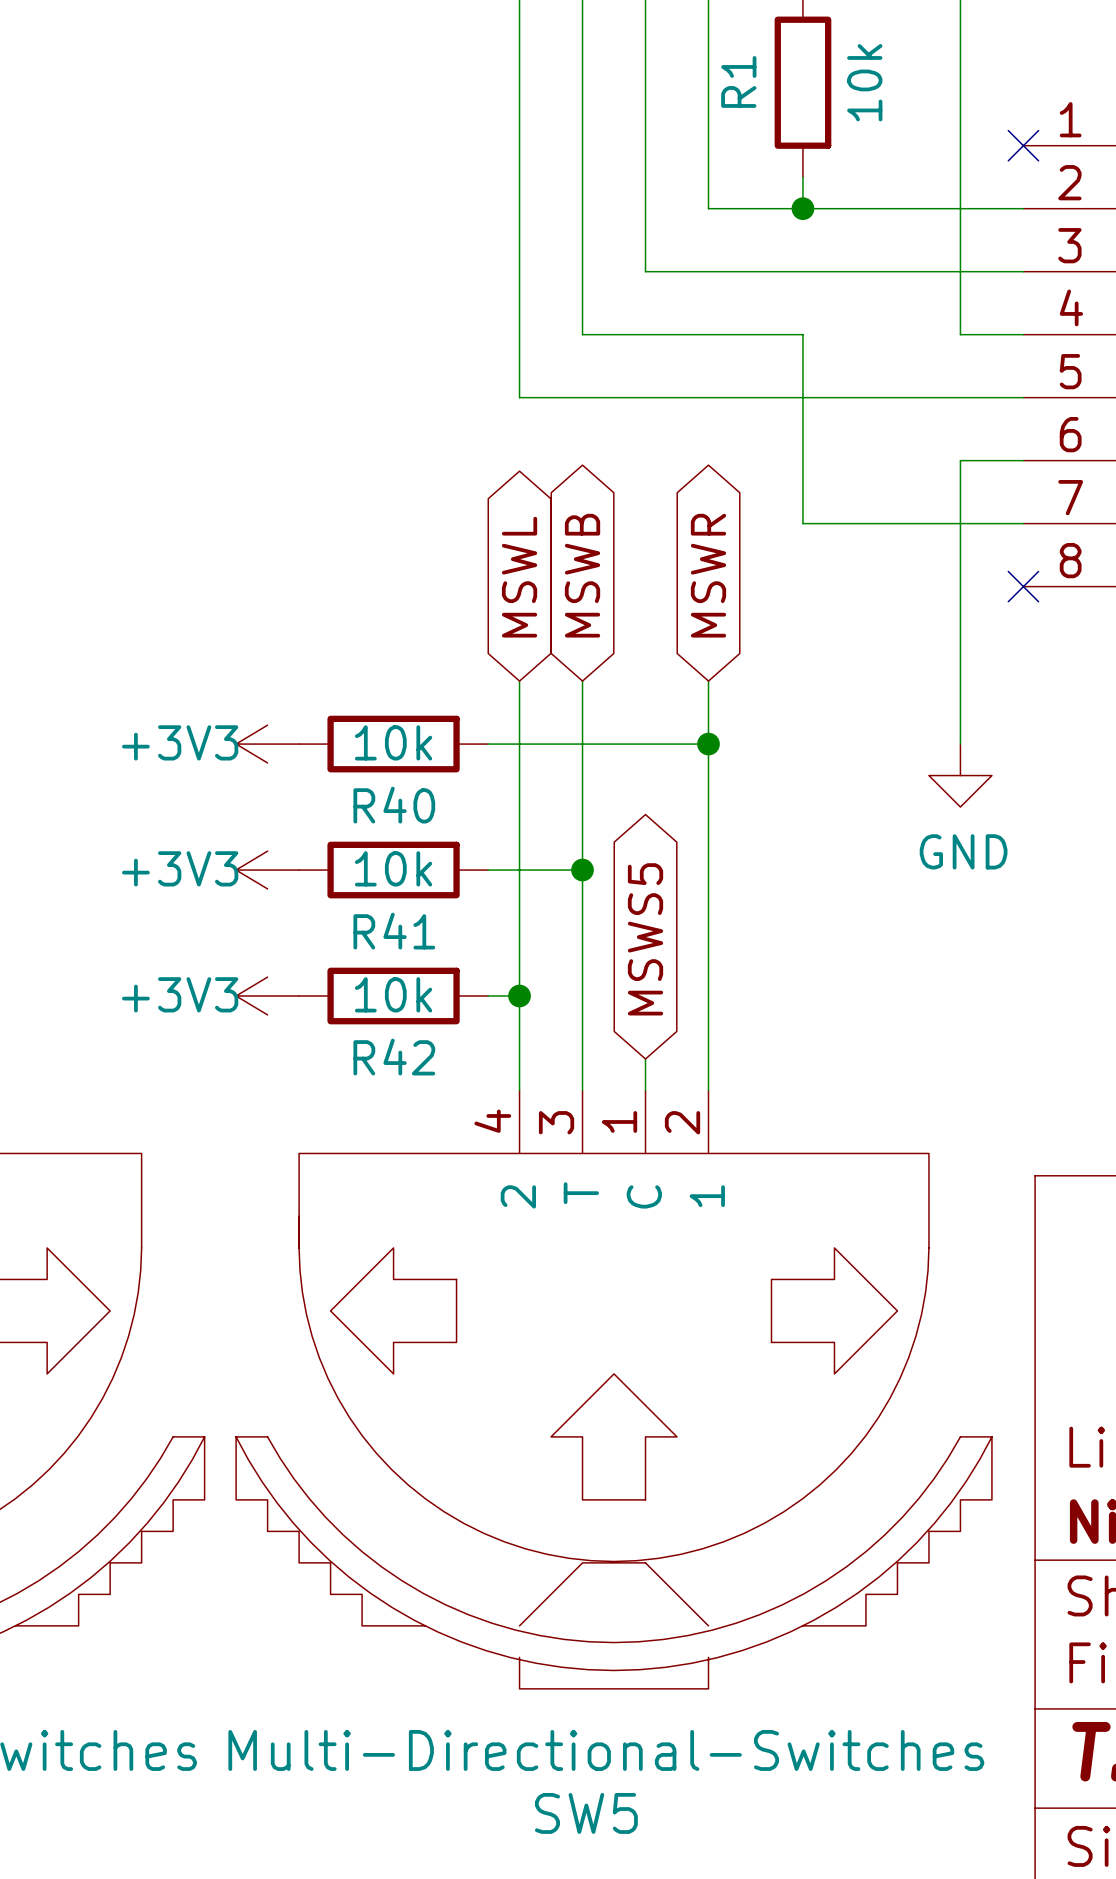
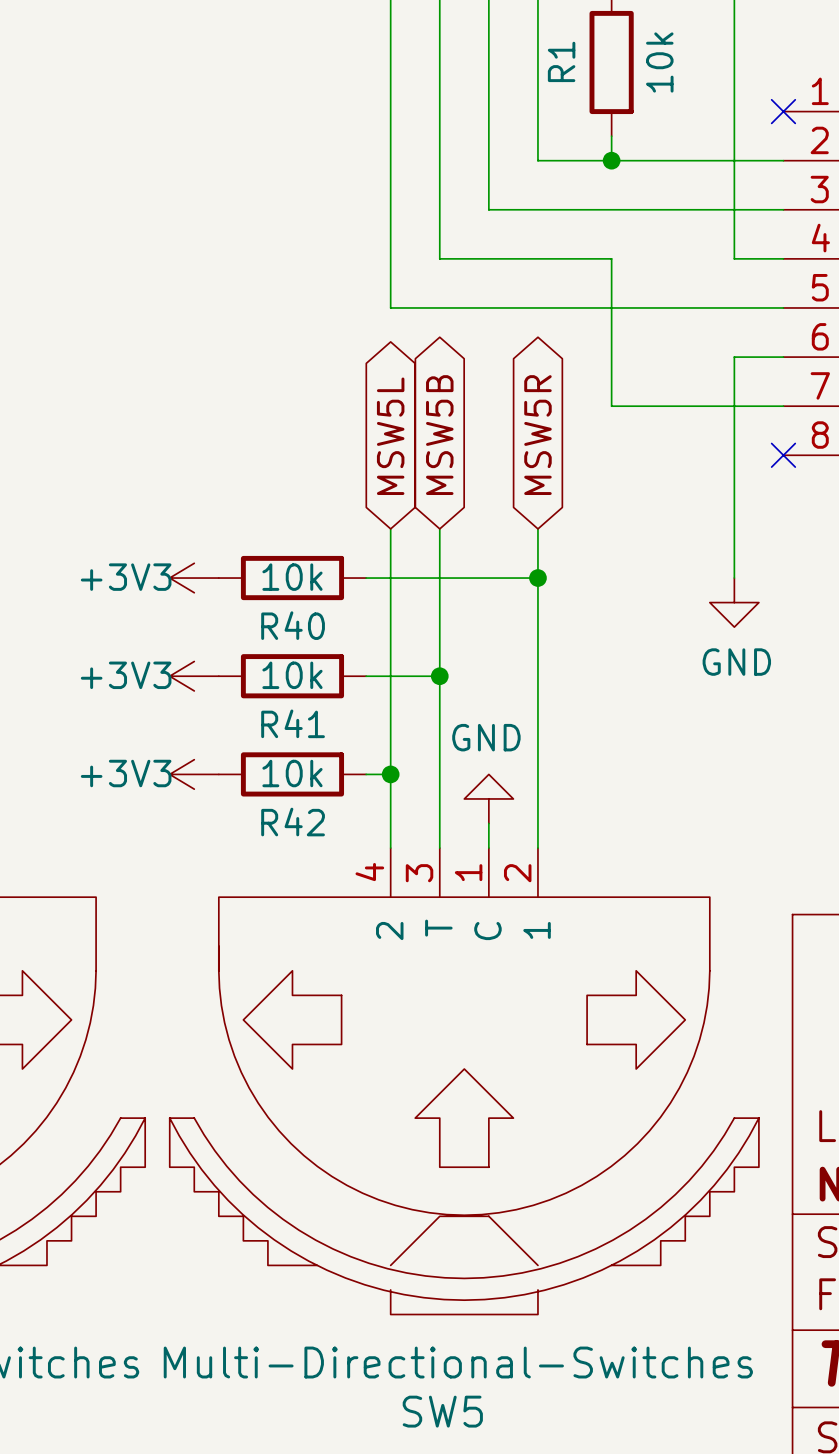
global label: MSWB (582, 575) -> MSW5B (439, 435)
global label: MSWR (708, 575) -> MSW5R (537, 435)
global label: MSWL (519, 577) -> MSW5L (390, 436)
global label: MSWS5 (645, 939) -> none
power symbol: none -> GND (488, 798)

